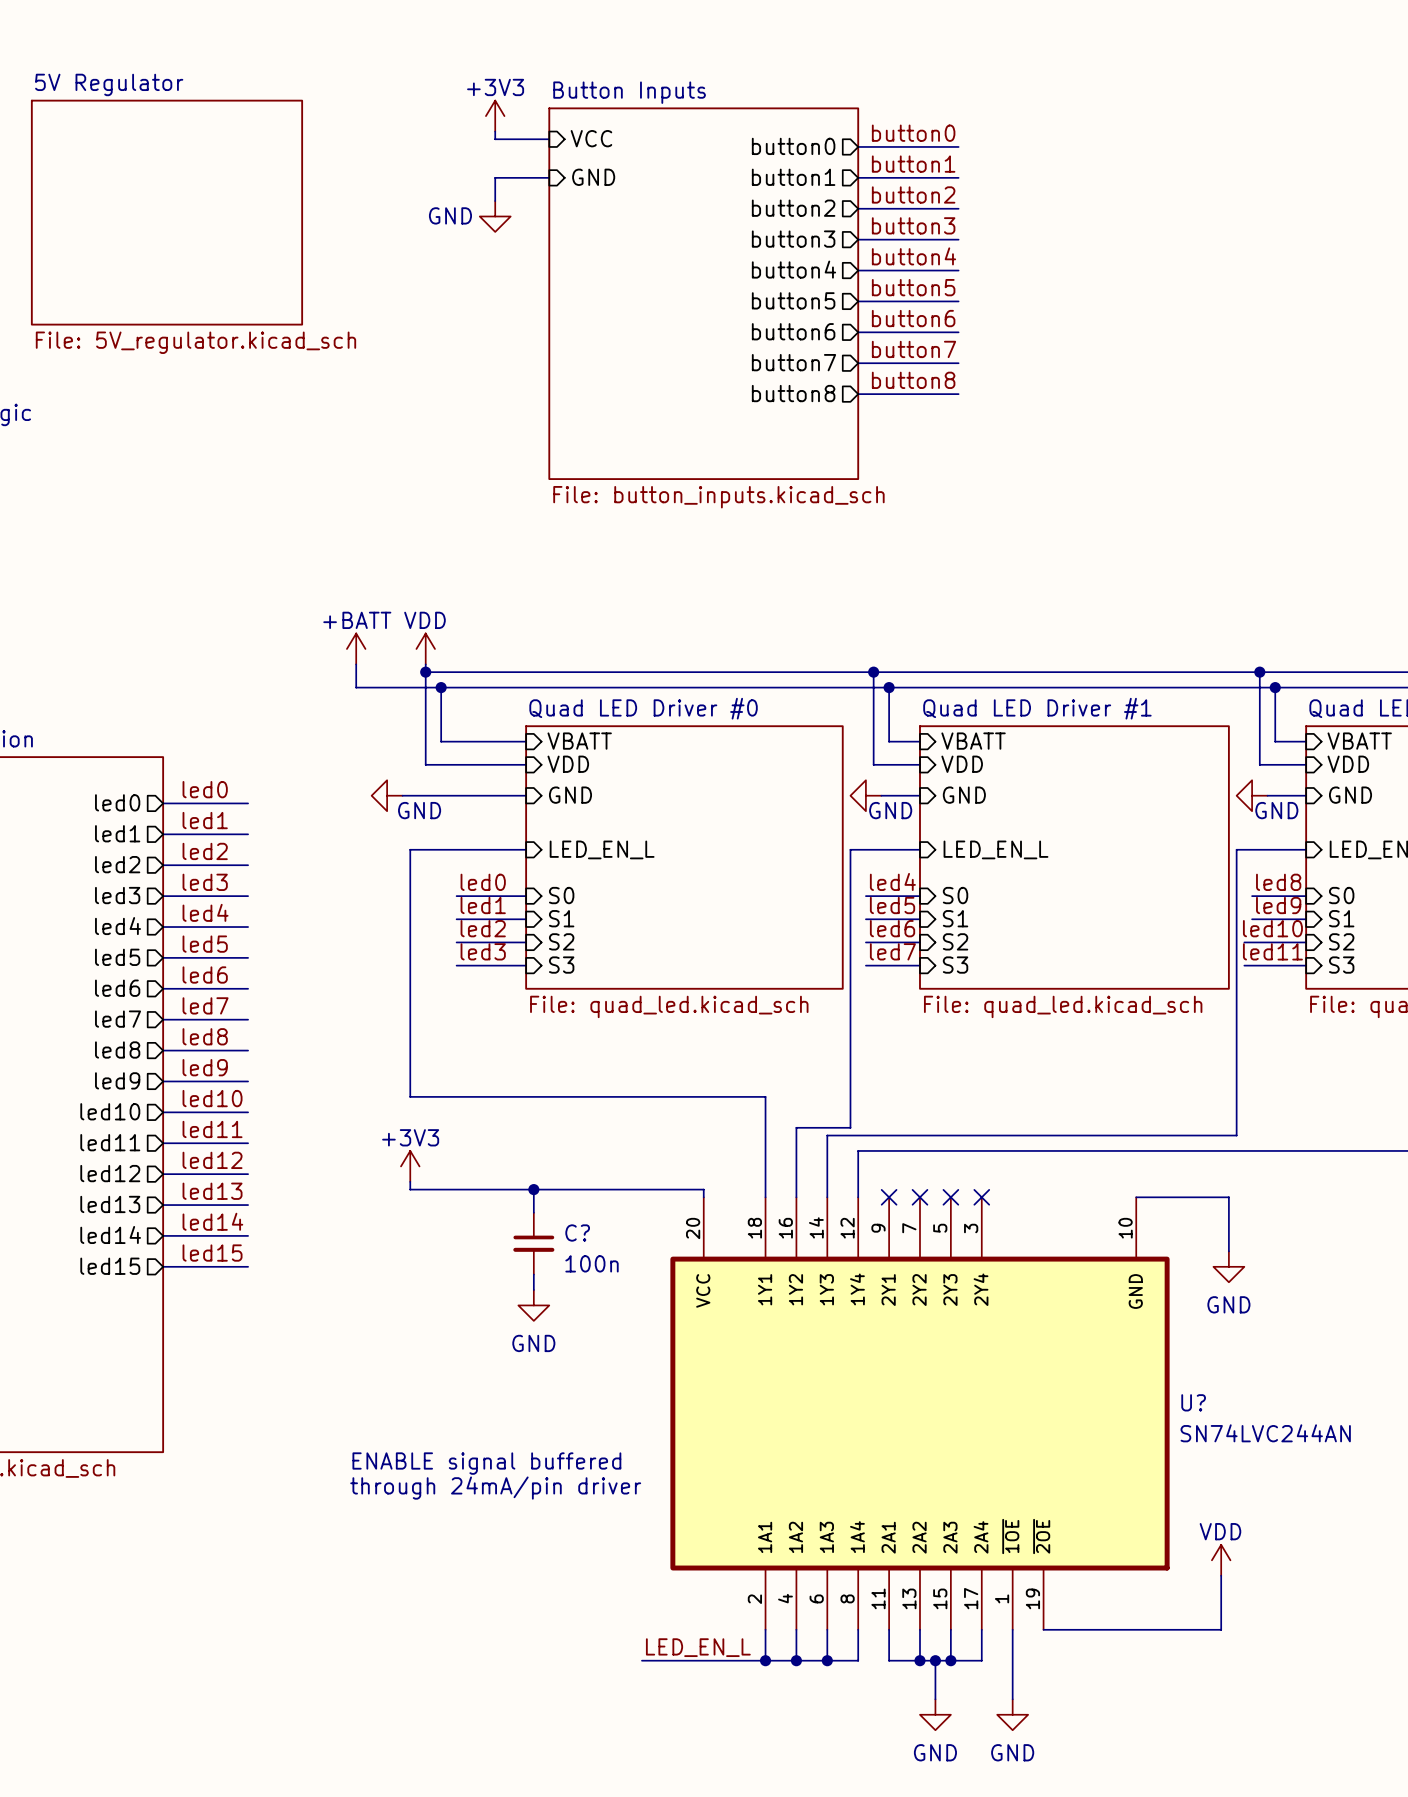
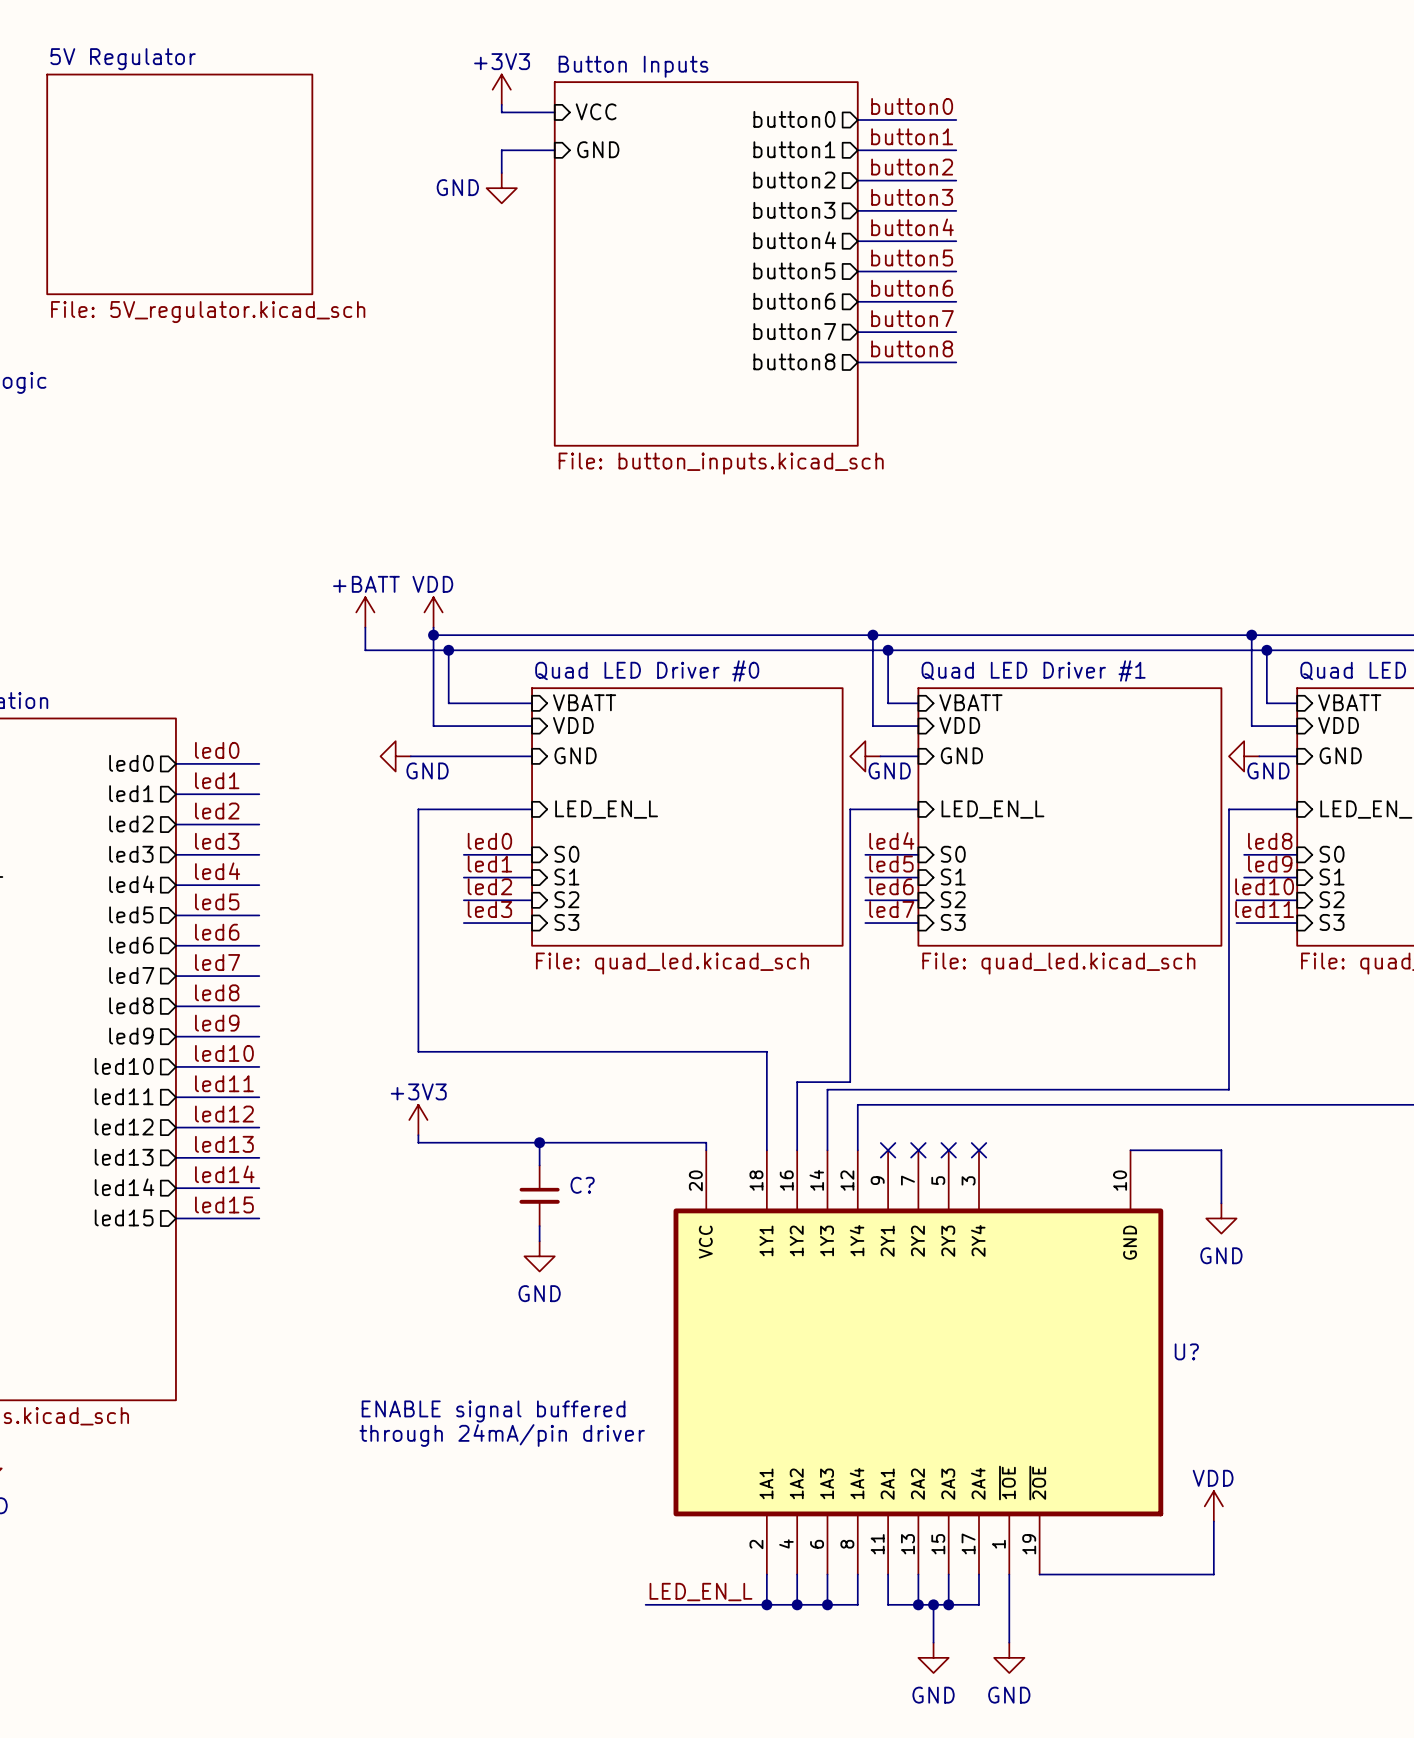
C? value: 100n (592, 1263) -> none
U? value: SN74LVC244AN (1265, 1433) -> none

